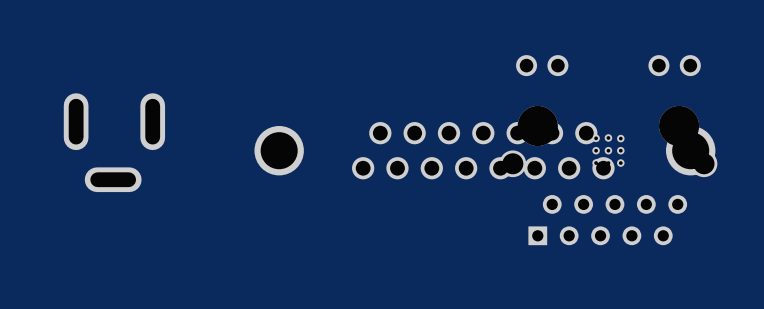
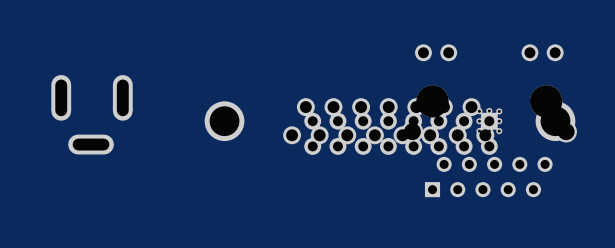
part: none -> (401, 133)

